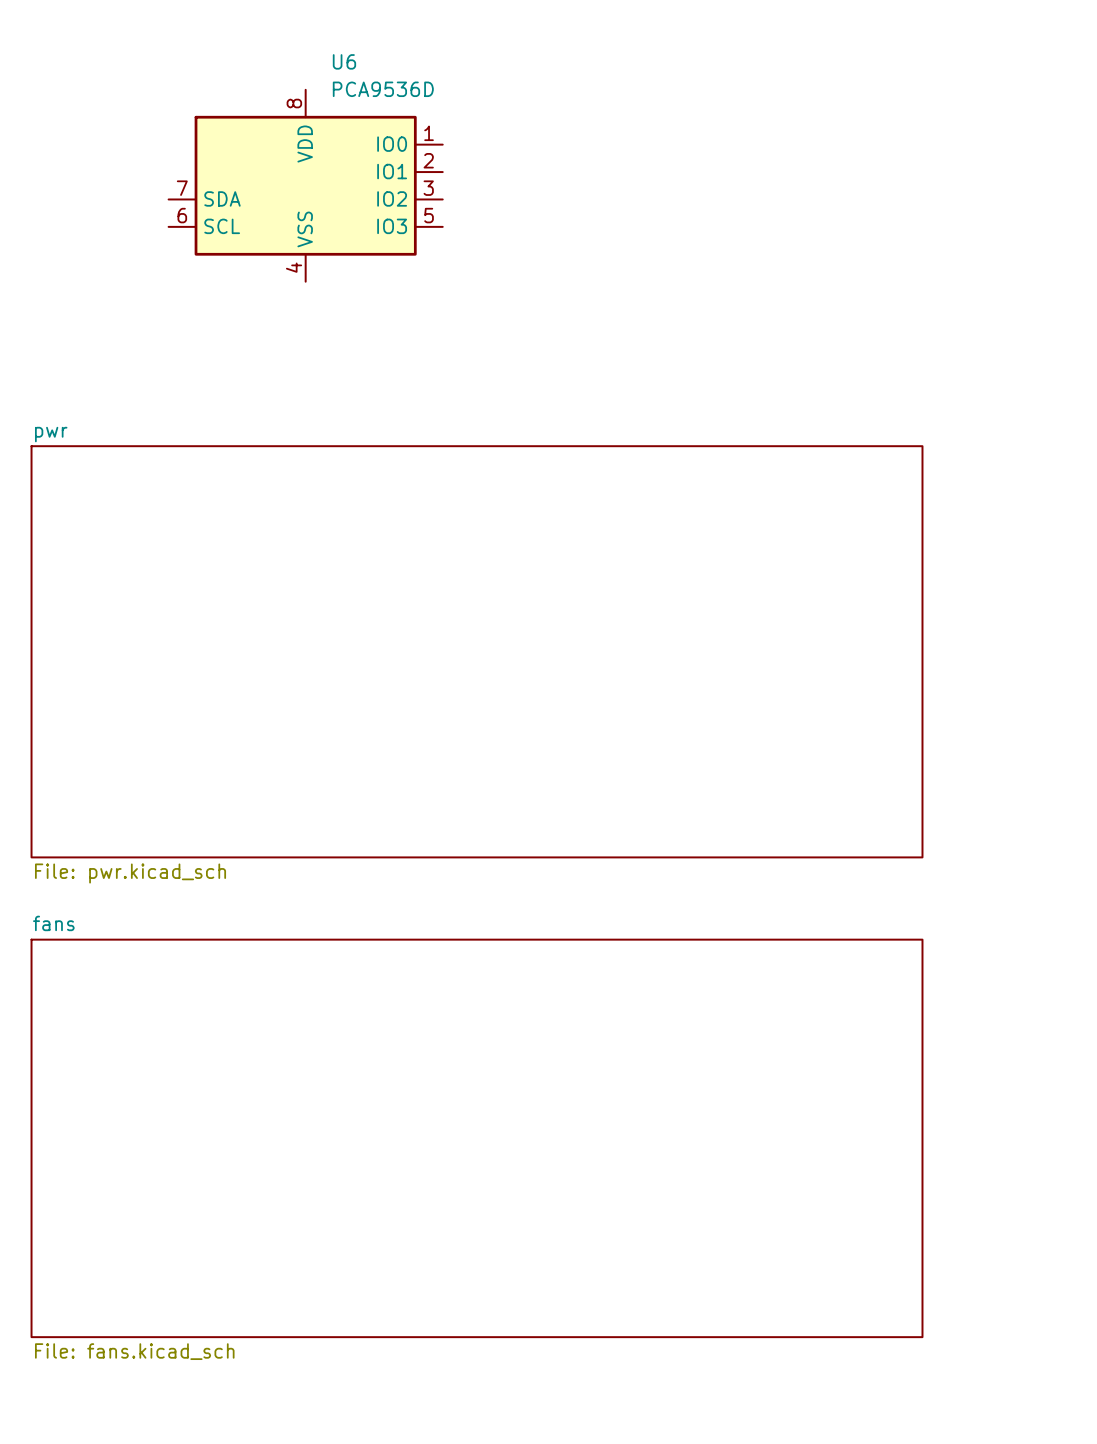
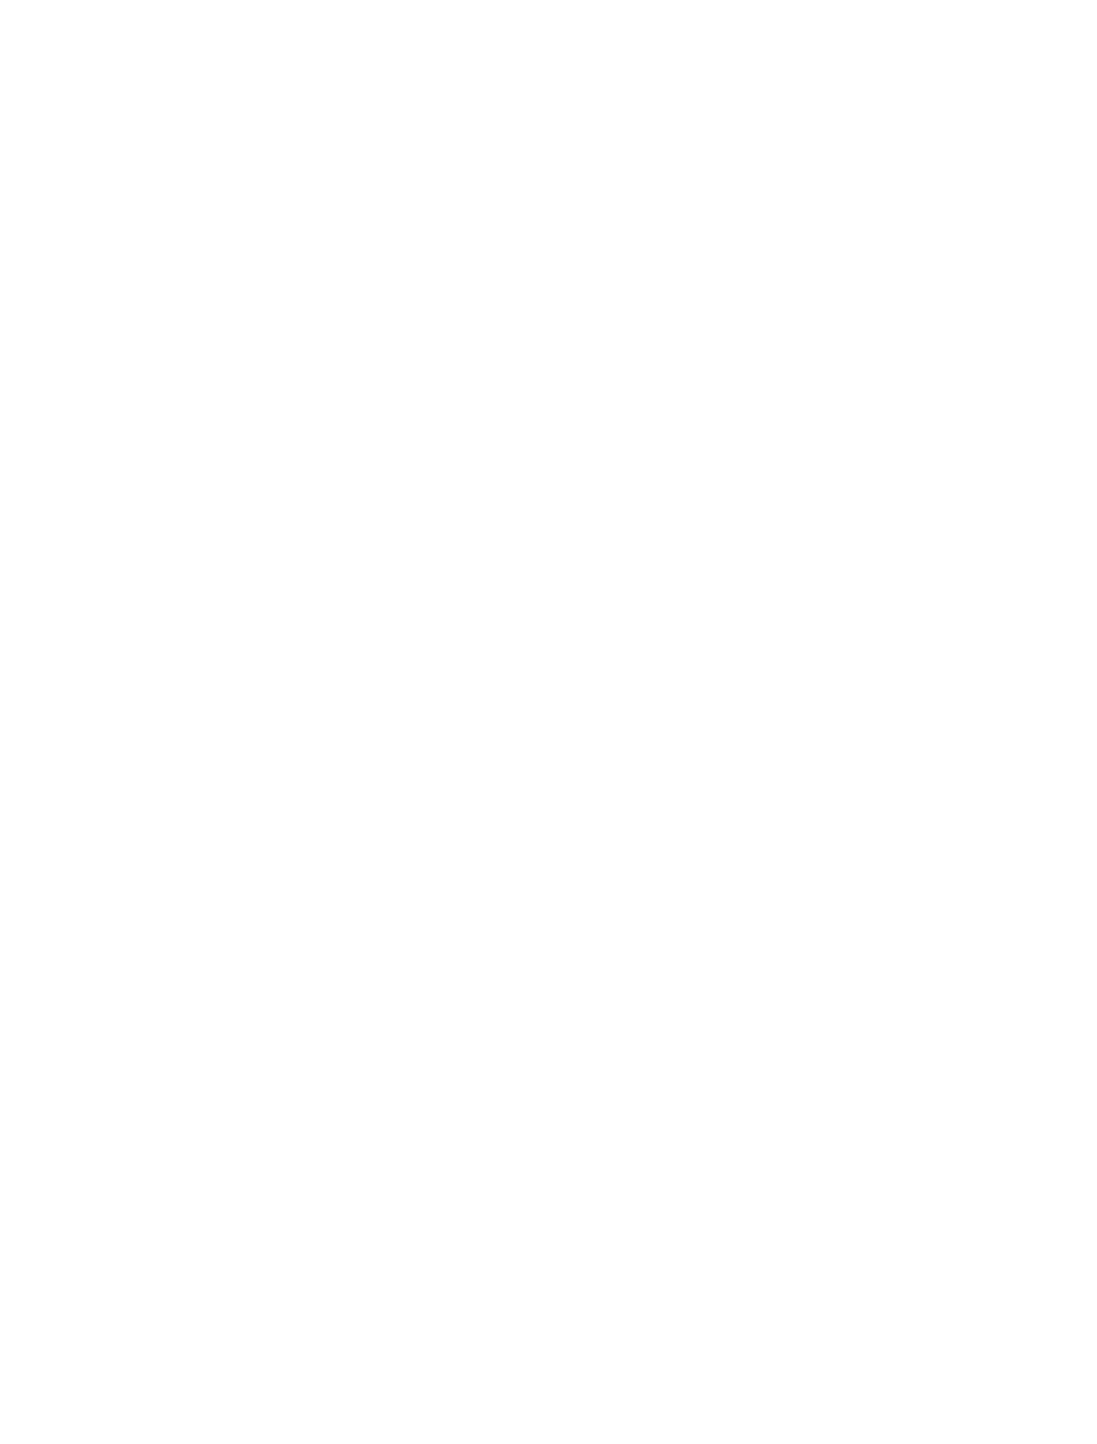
U6: PCA9536D (305, 185) -> none
sheet pwr: File: pwr.kicad_sch (477, 651) -> none
sheet fans: File: fans.kicad_sch (477, 1138) -> none

